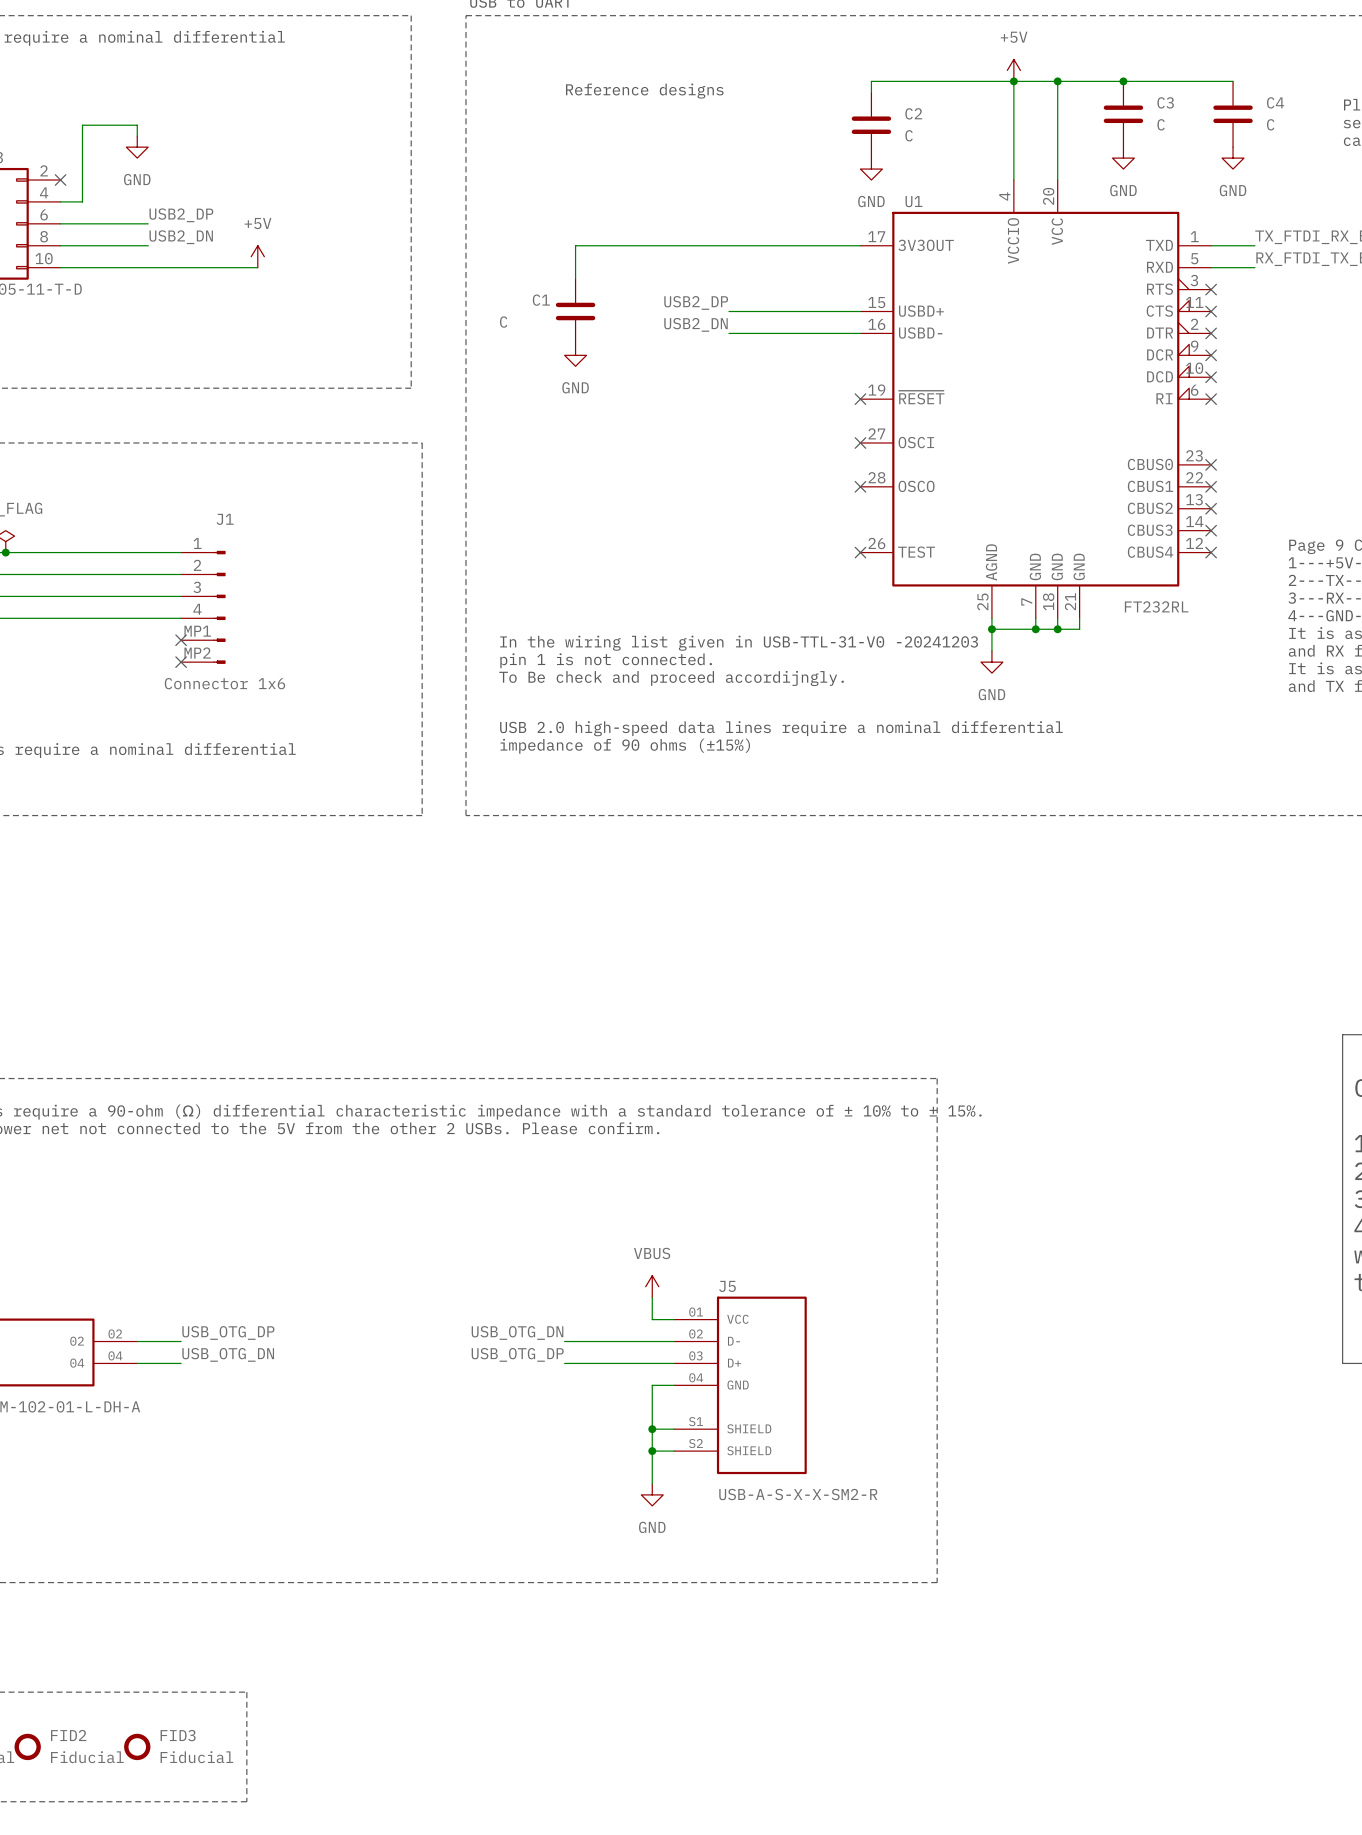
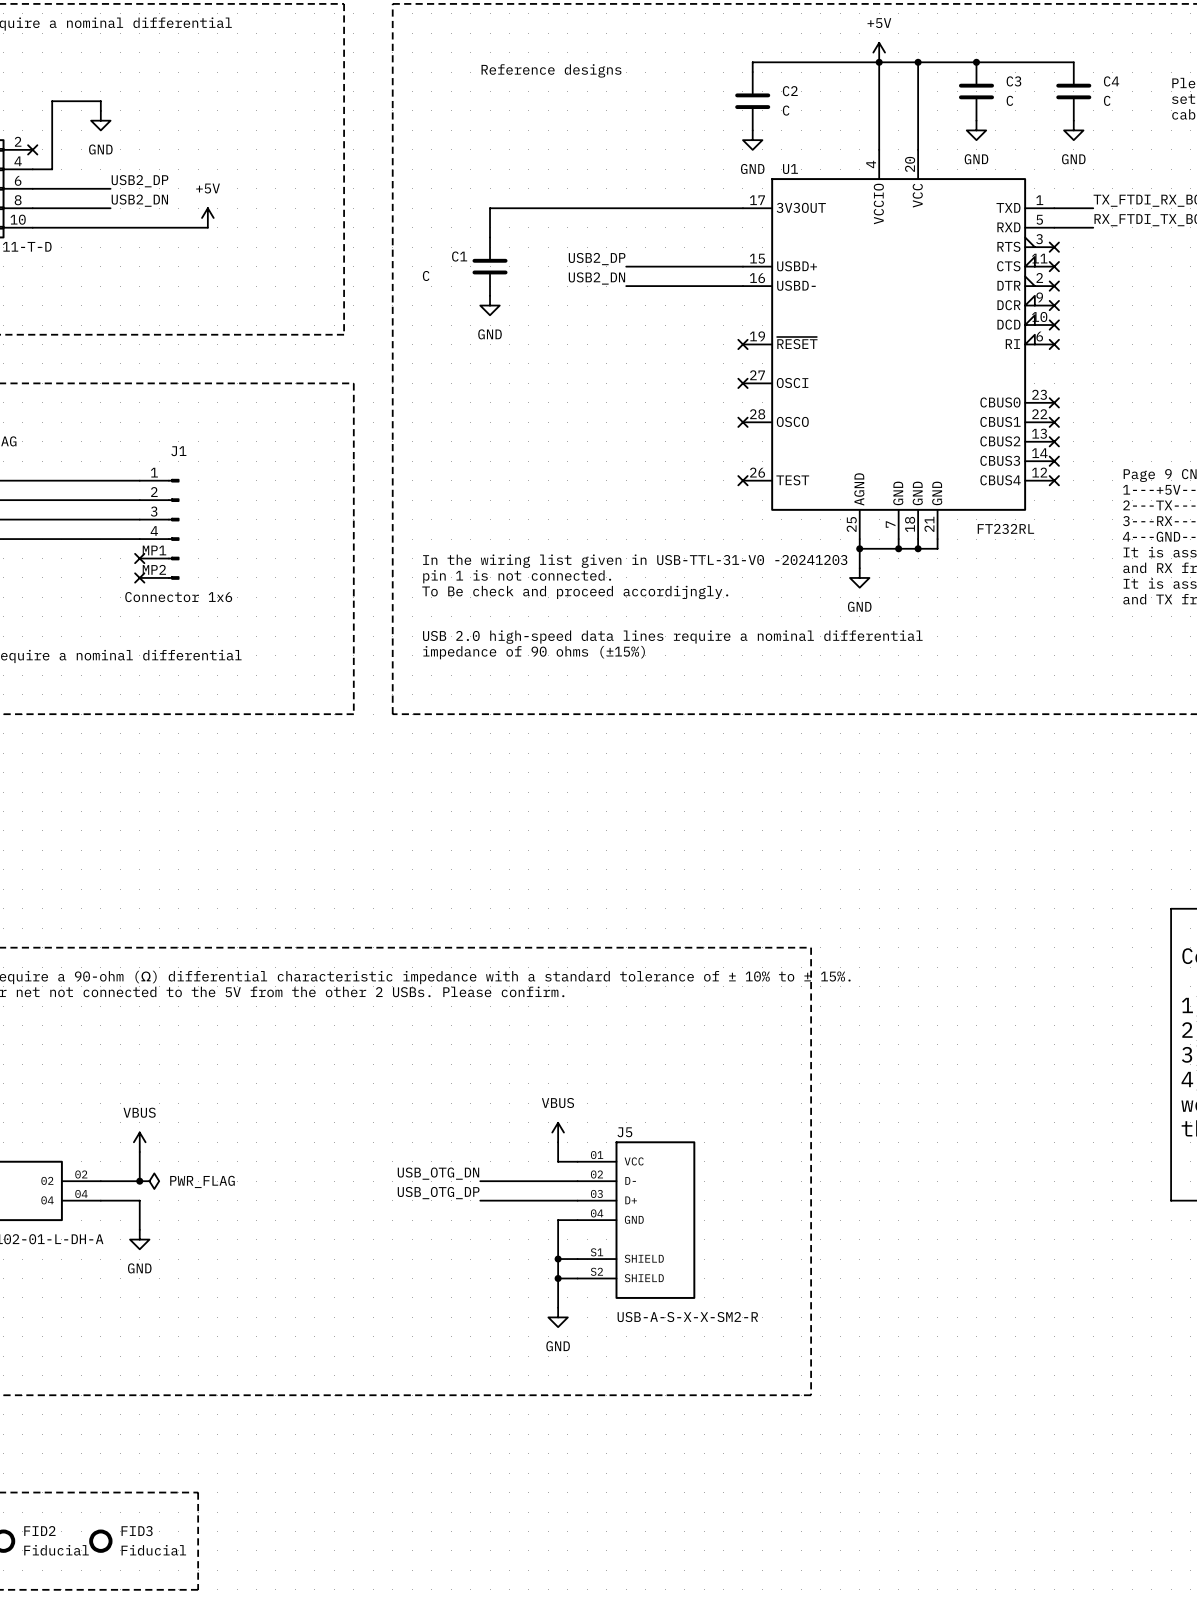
power symbol: none -> VBUS (139, 1142)
wire: none -> (139, 1152) (139, 1181)
label: USB_OTG_DP (228, 1332) -> none
junction: none -> (139, 1181)
power symbol: none -> PWR_FLAG (149, 1181)
label: USB_OTG_DN (228, 1354) -> none
wire: none -> (139, 1200) (139, 1229)
power symbol: none -> GND (139, 1239)

